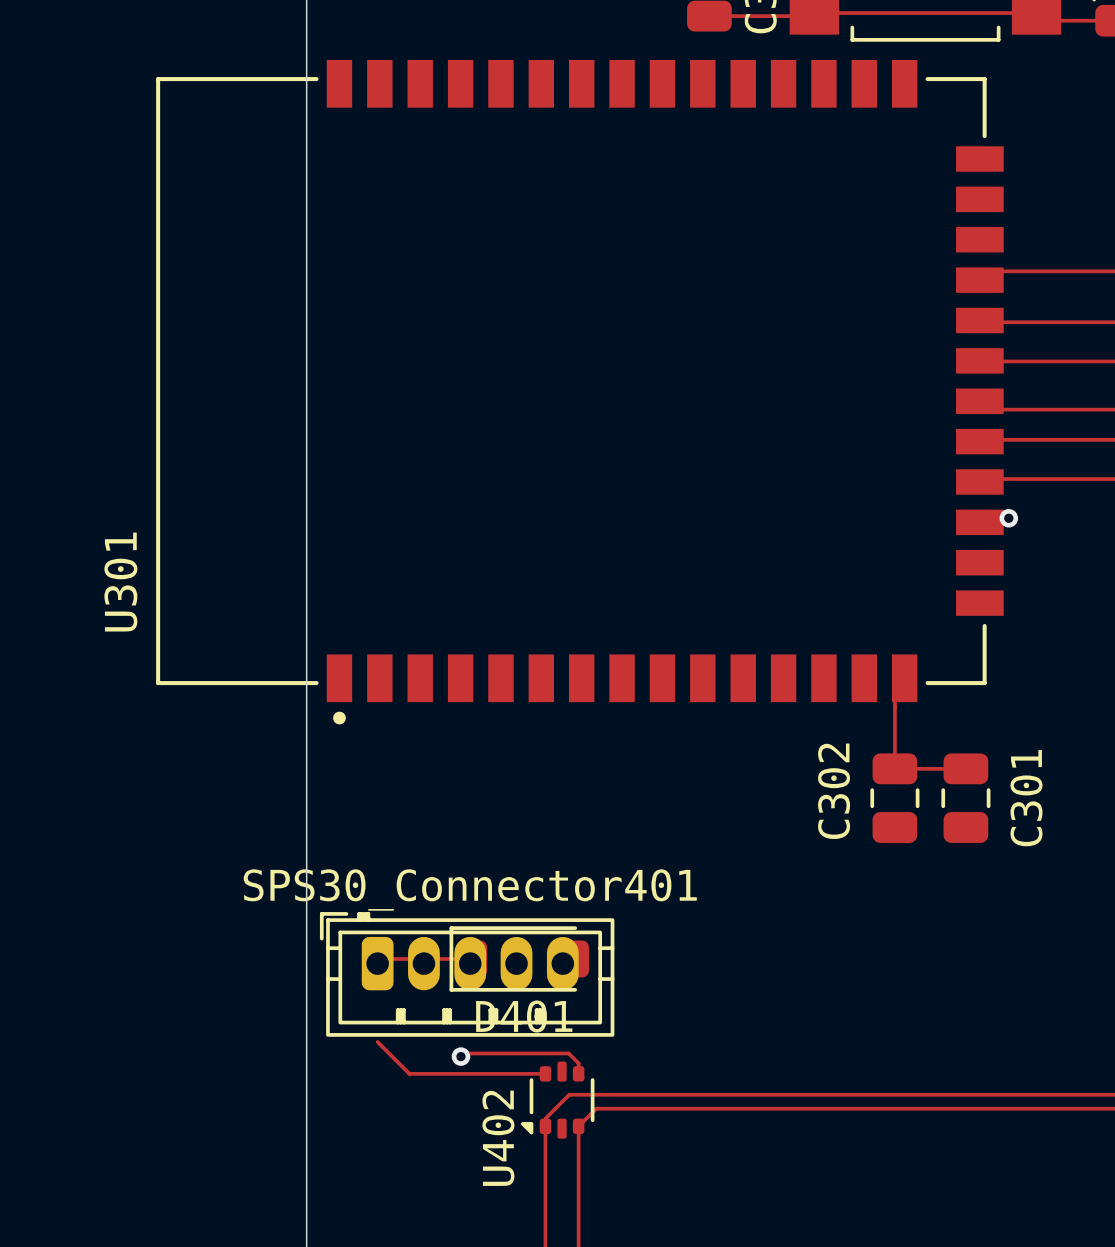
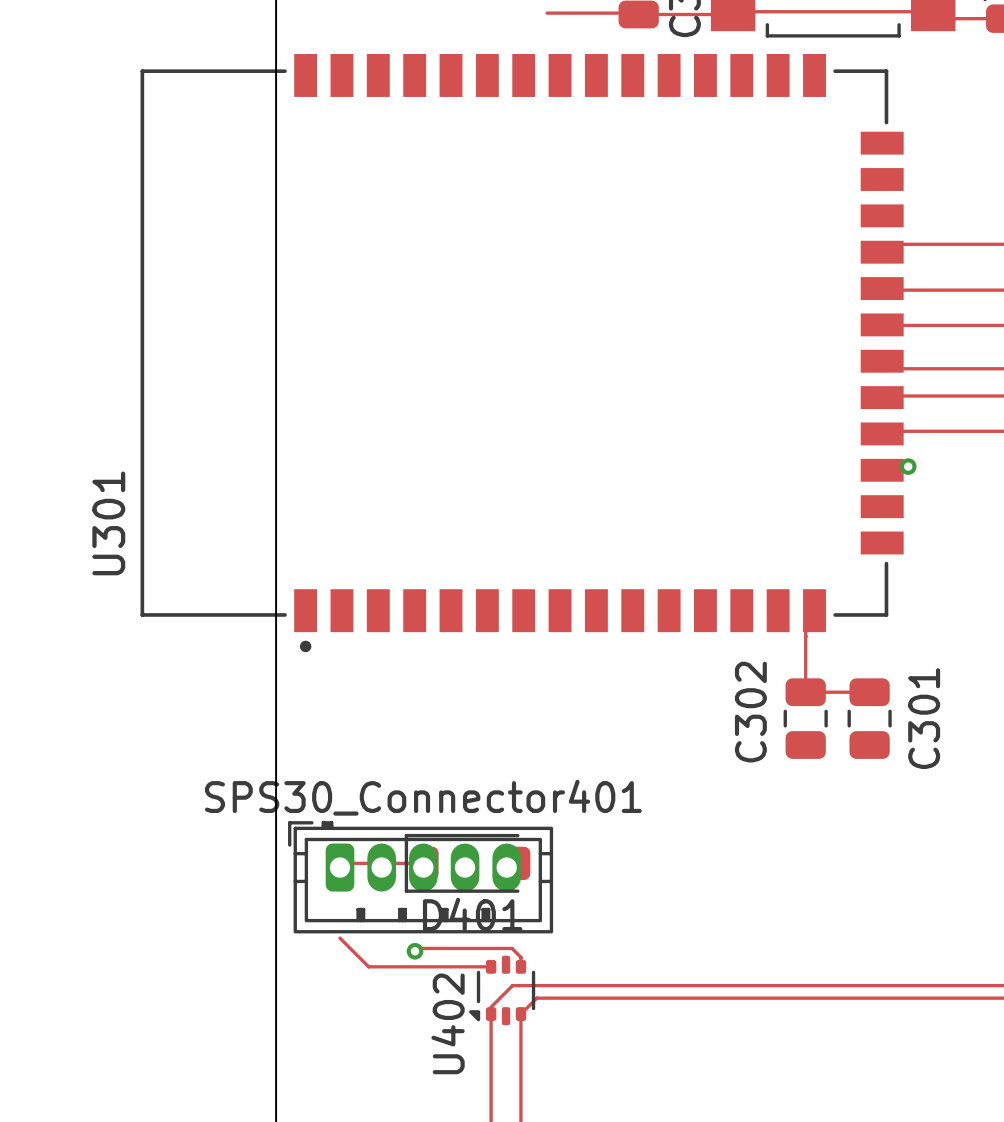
track: none -> (547, 13) (637, 13)

